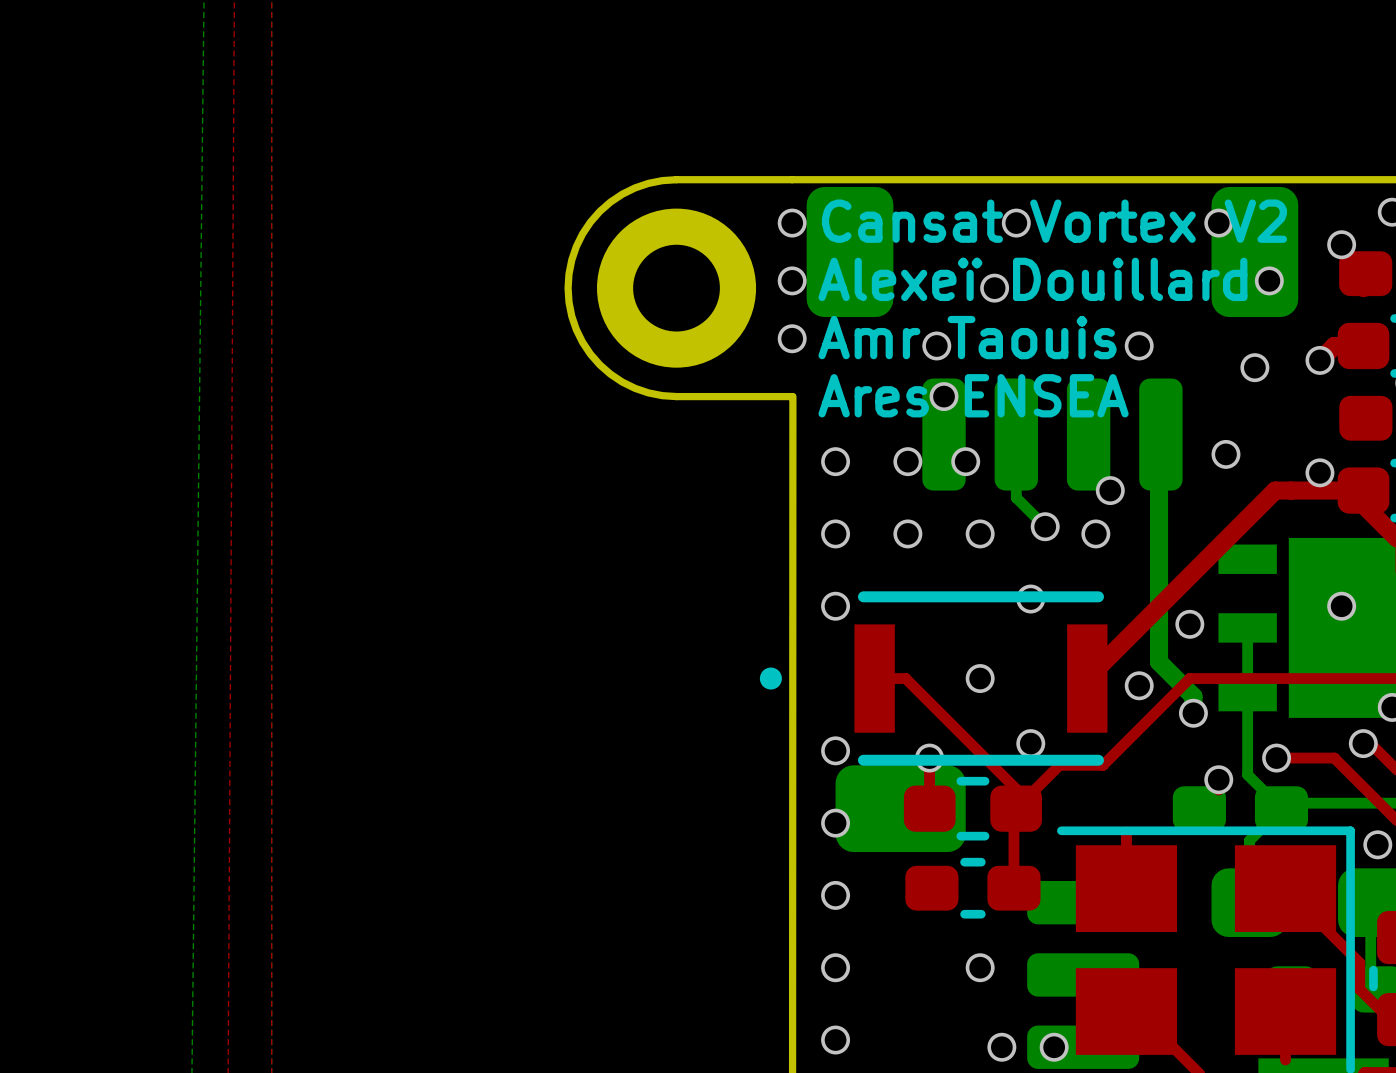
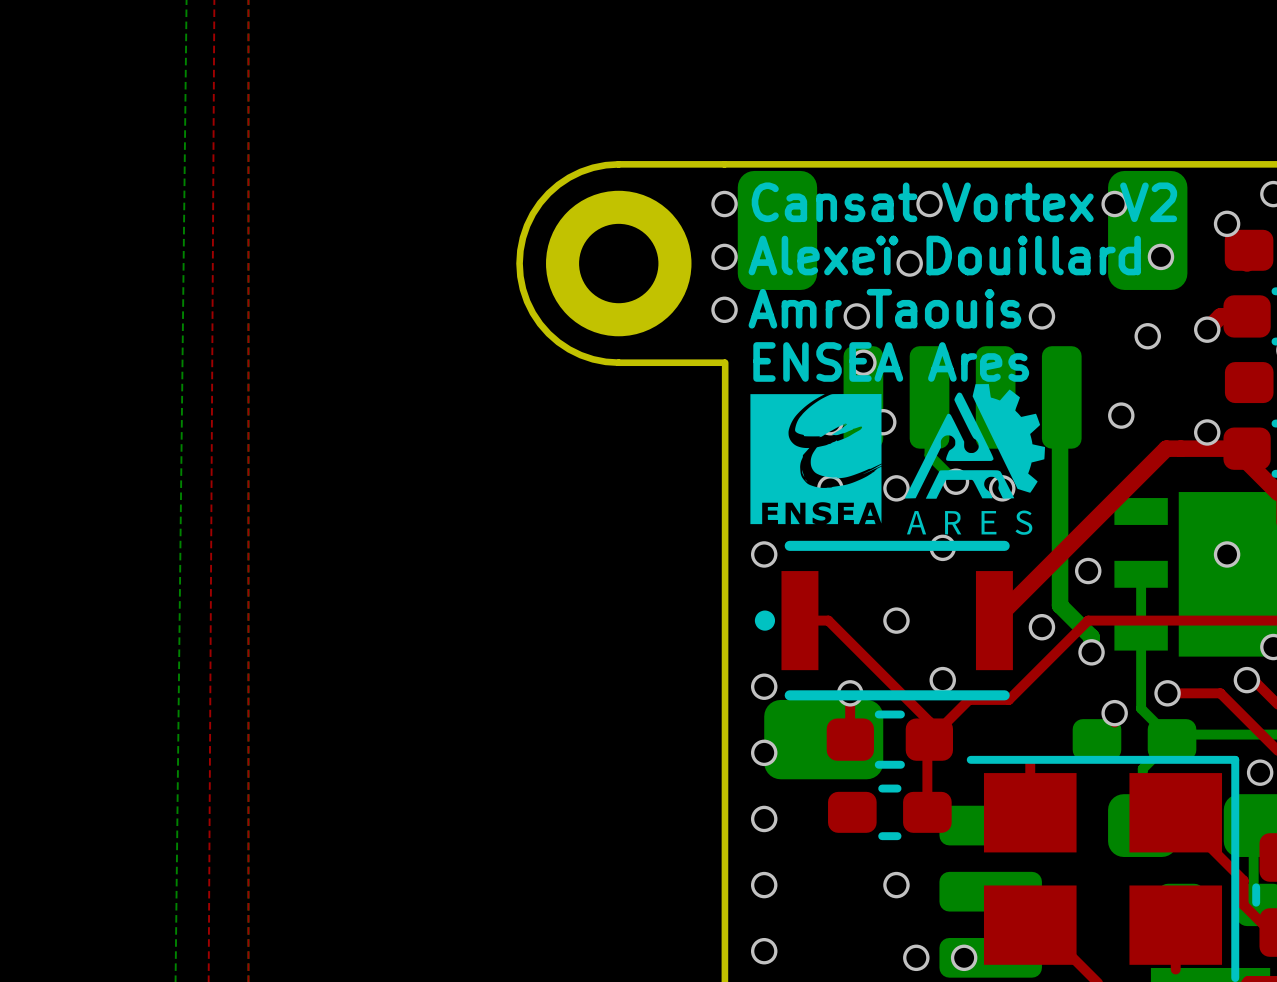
text: Ares ENSEA (973, 395) -> ENSEA Ares (891, 361)
drawing: none -> [750, 384, 1045, 535]
part footprint: [759, 591, 1108, 766] -> [754, 540, 1013, 701]

